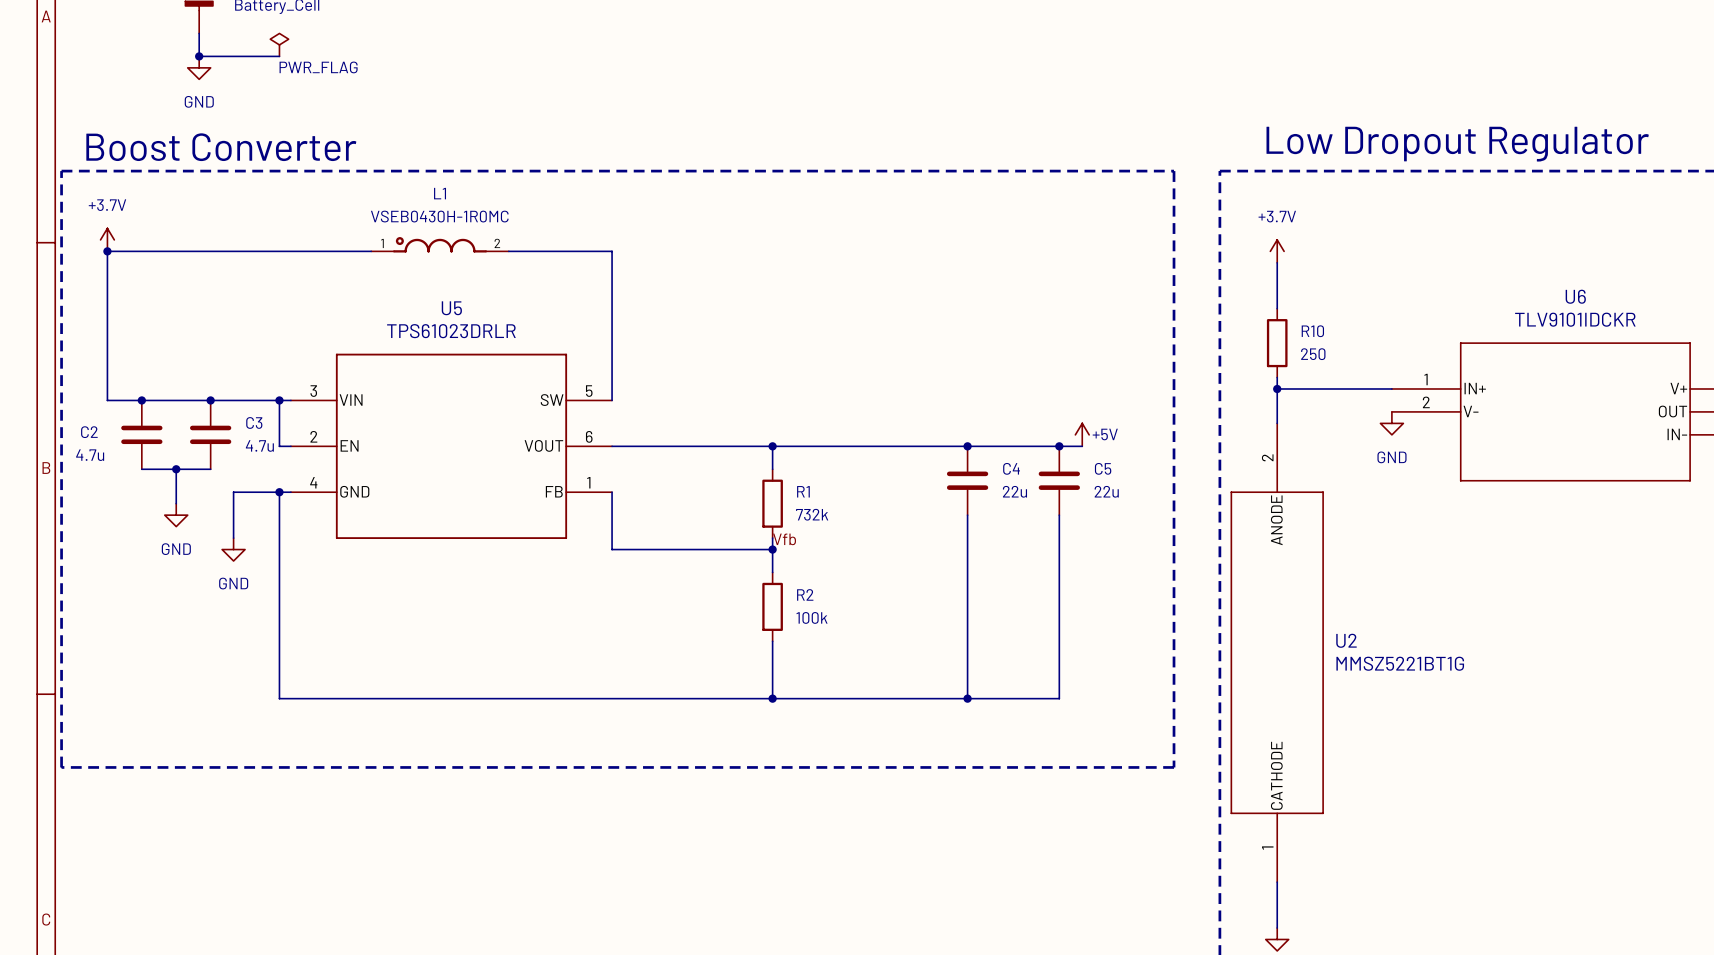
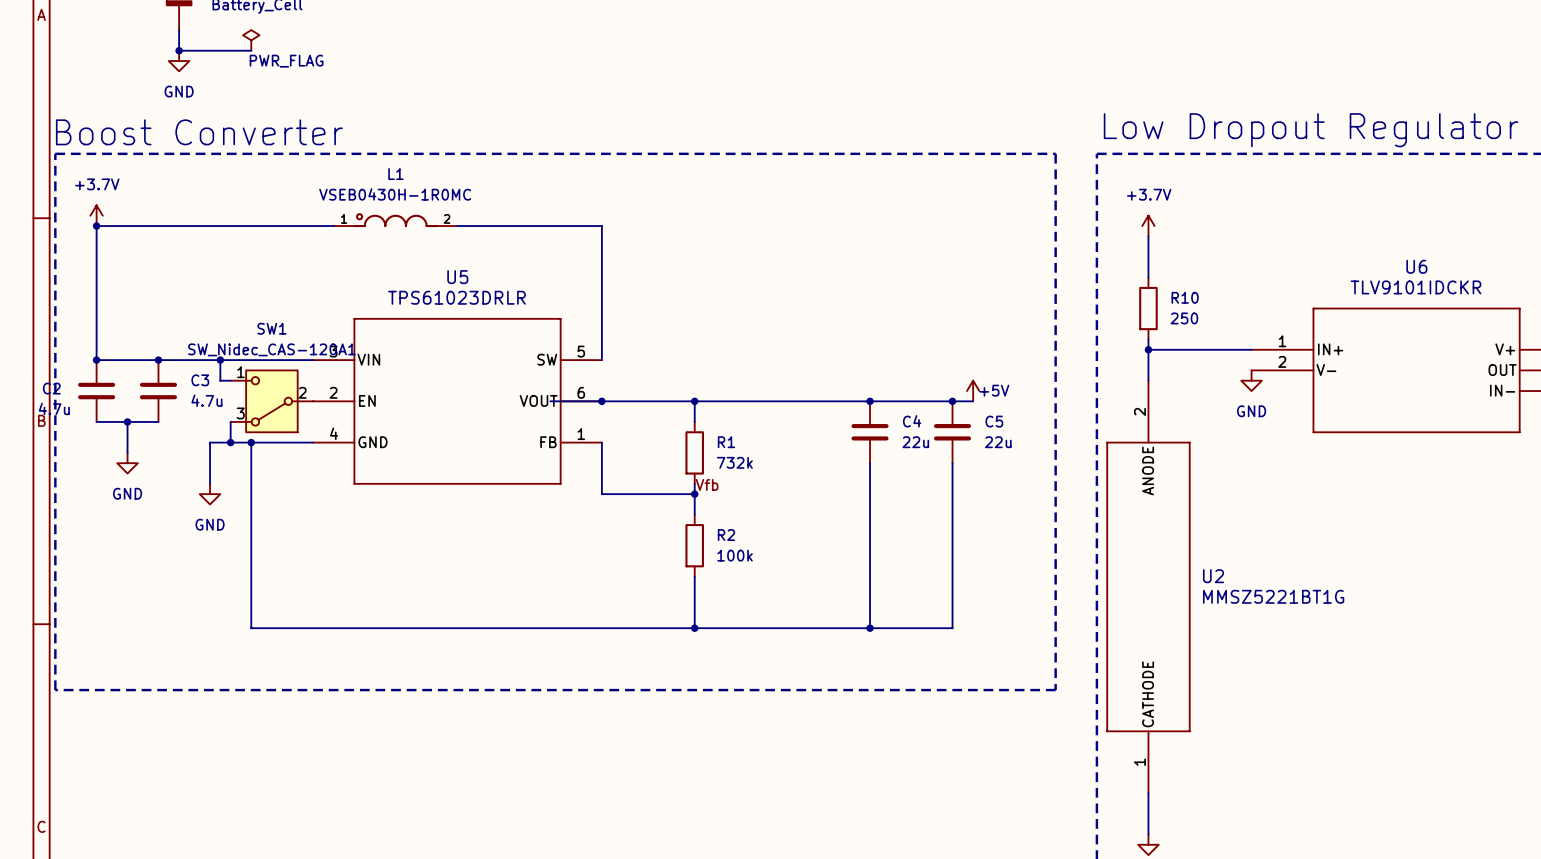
wire: (612, 251) (612, 400) -> (550, 226) (601, 226) (601, 360)
junction: none -> (96, 360)
junction: (141, 400) -> none
junction: none -> (158, 360)
junction: (210, 400) -> none
wire: none -> (220, 360) (220, 380) (230, 380)
junction: none -> (220, 360)
junction: (279, 400) -> none
C2 position: (141, 434) -> (96, 391)
C3 position: (210, 434) -> (158, 391)
SW1: none -> SW_Nidec_CAS-120A1 (271, 401)
U5 position: (451, 446) -> (457, 401)
junction: none -> (601, 401)
wire: none -> (96, 421) (127, 421) (127, 452)
junction: none -> (127, 421)
junction: (176, 469) -> none
wire: (210, 469) (176, 469) (176, 503) -> none
wire: none -> (230, 421) (230, 442)
junction: none -> (230, 442)
wire: (612, 492) (612, 549) (669, 549) -> (601, 442) (601, 494)
power symbol position: GND (176, 515) -> GND (127, 463)

